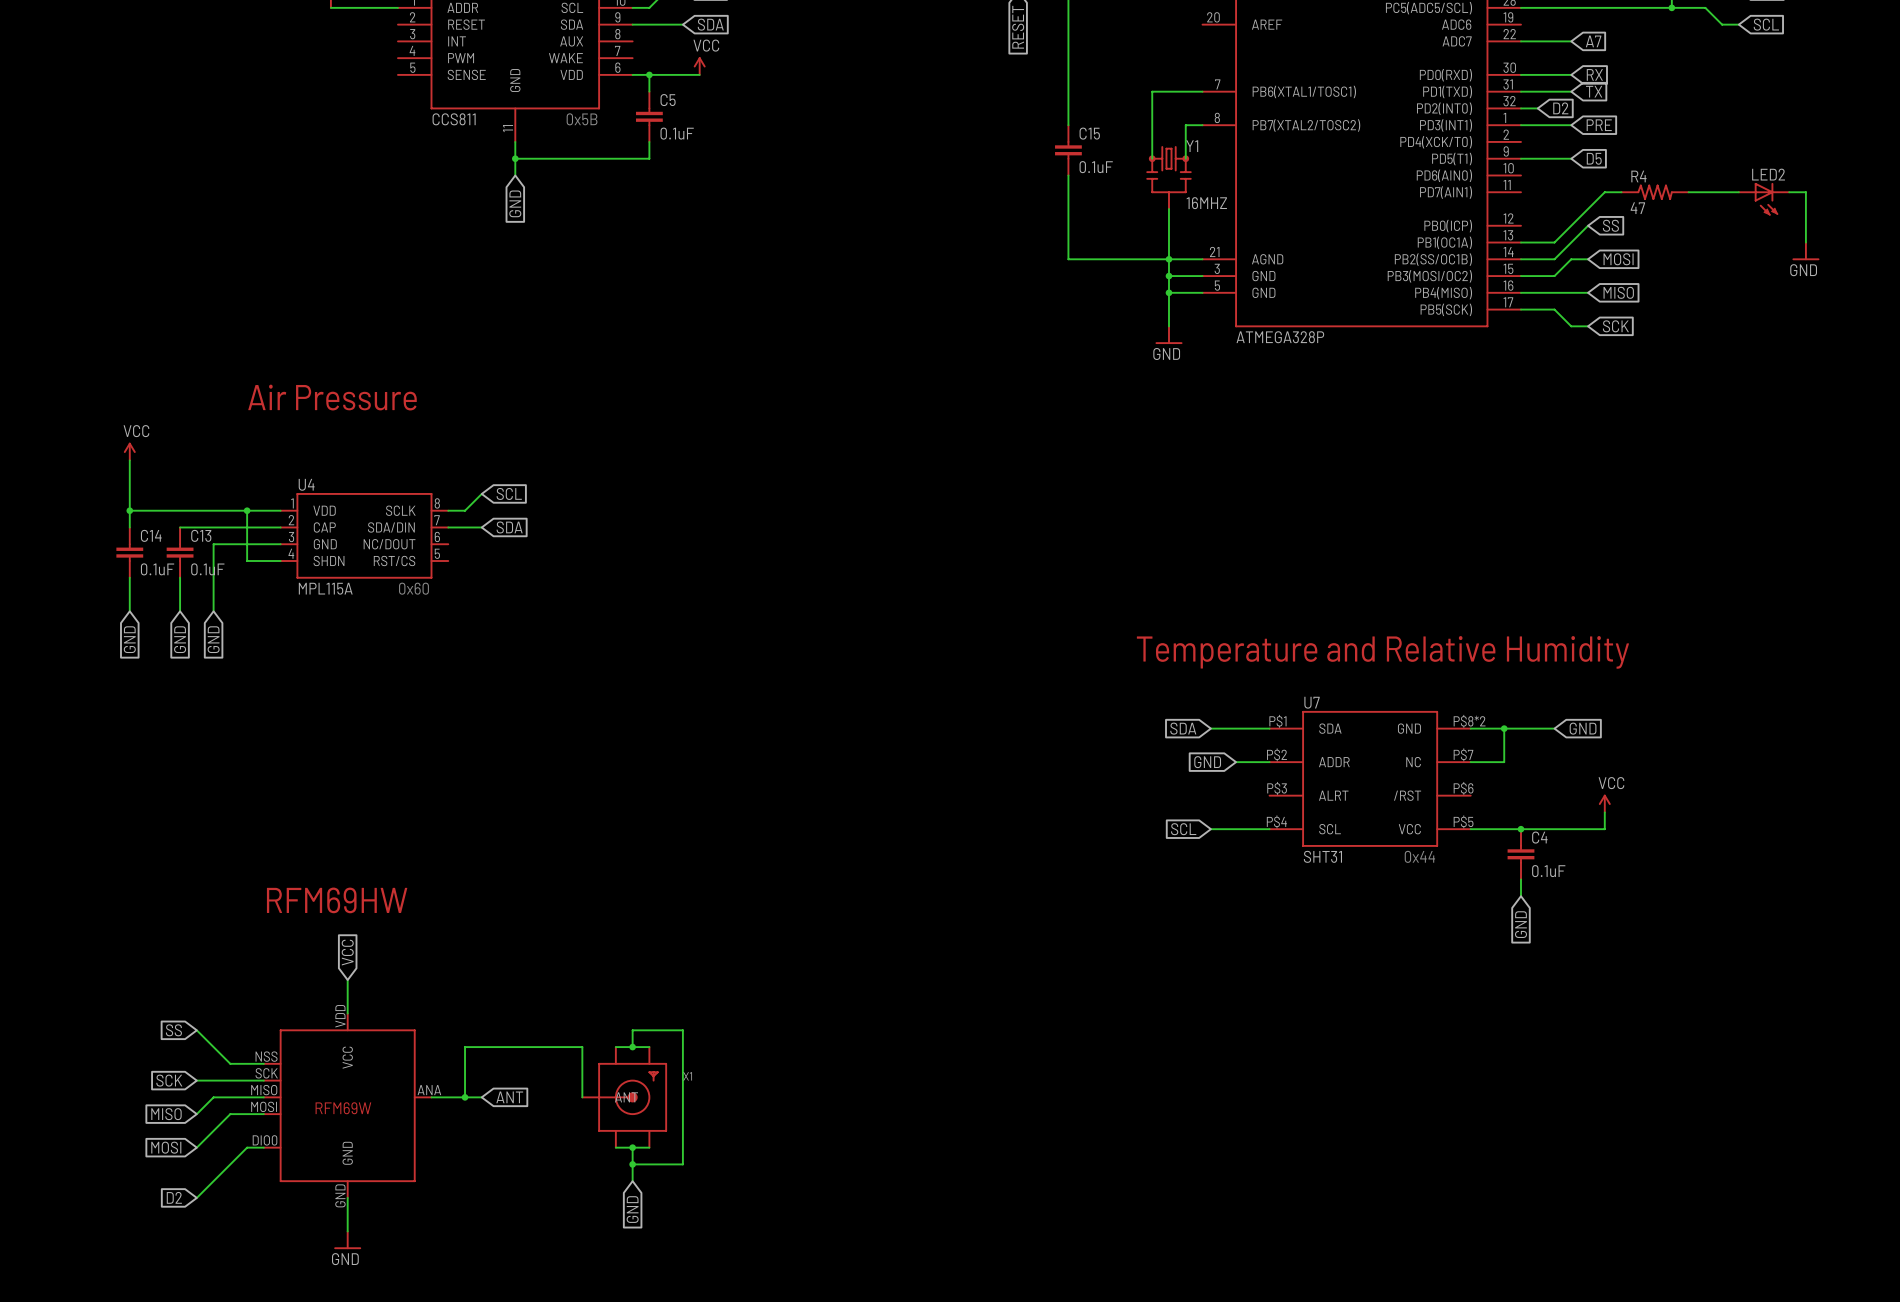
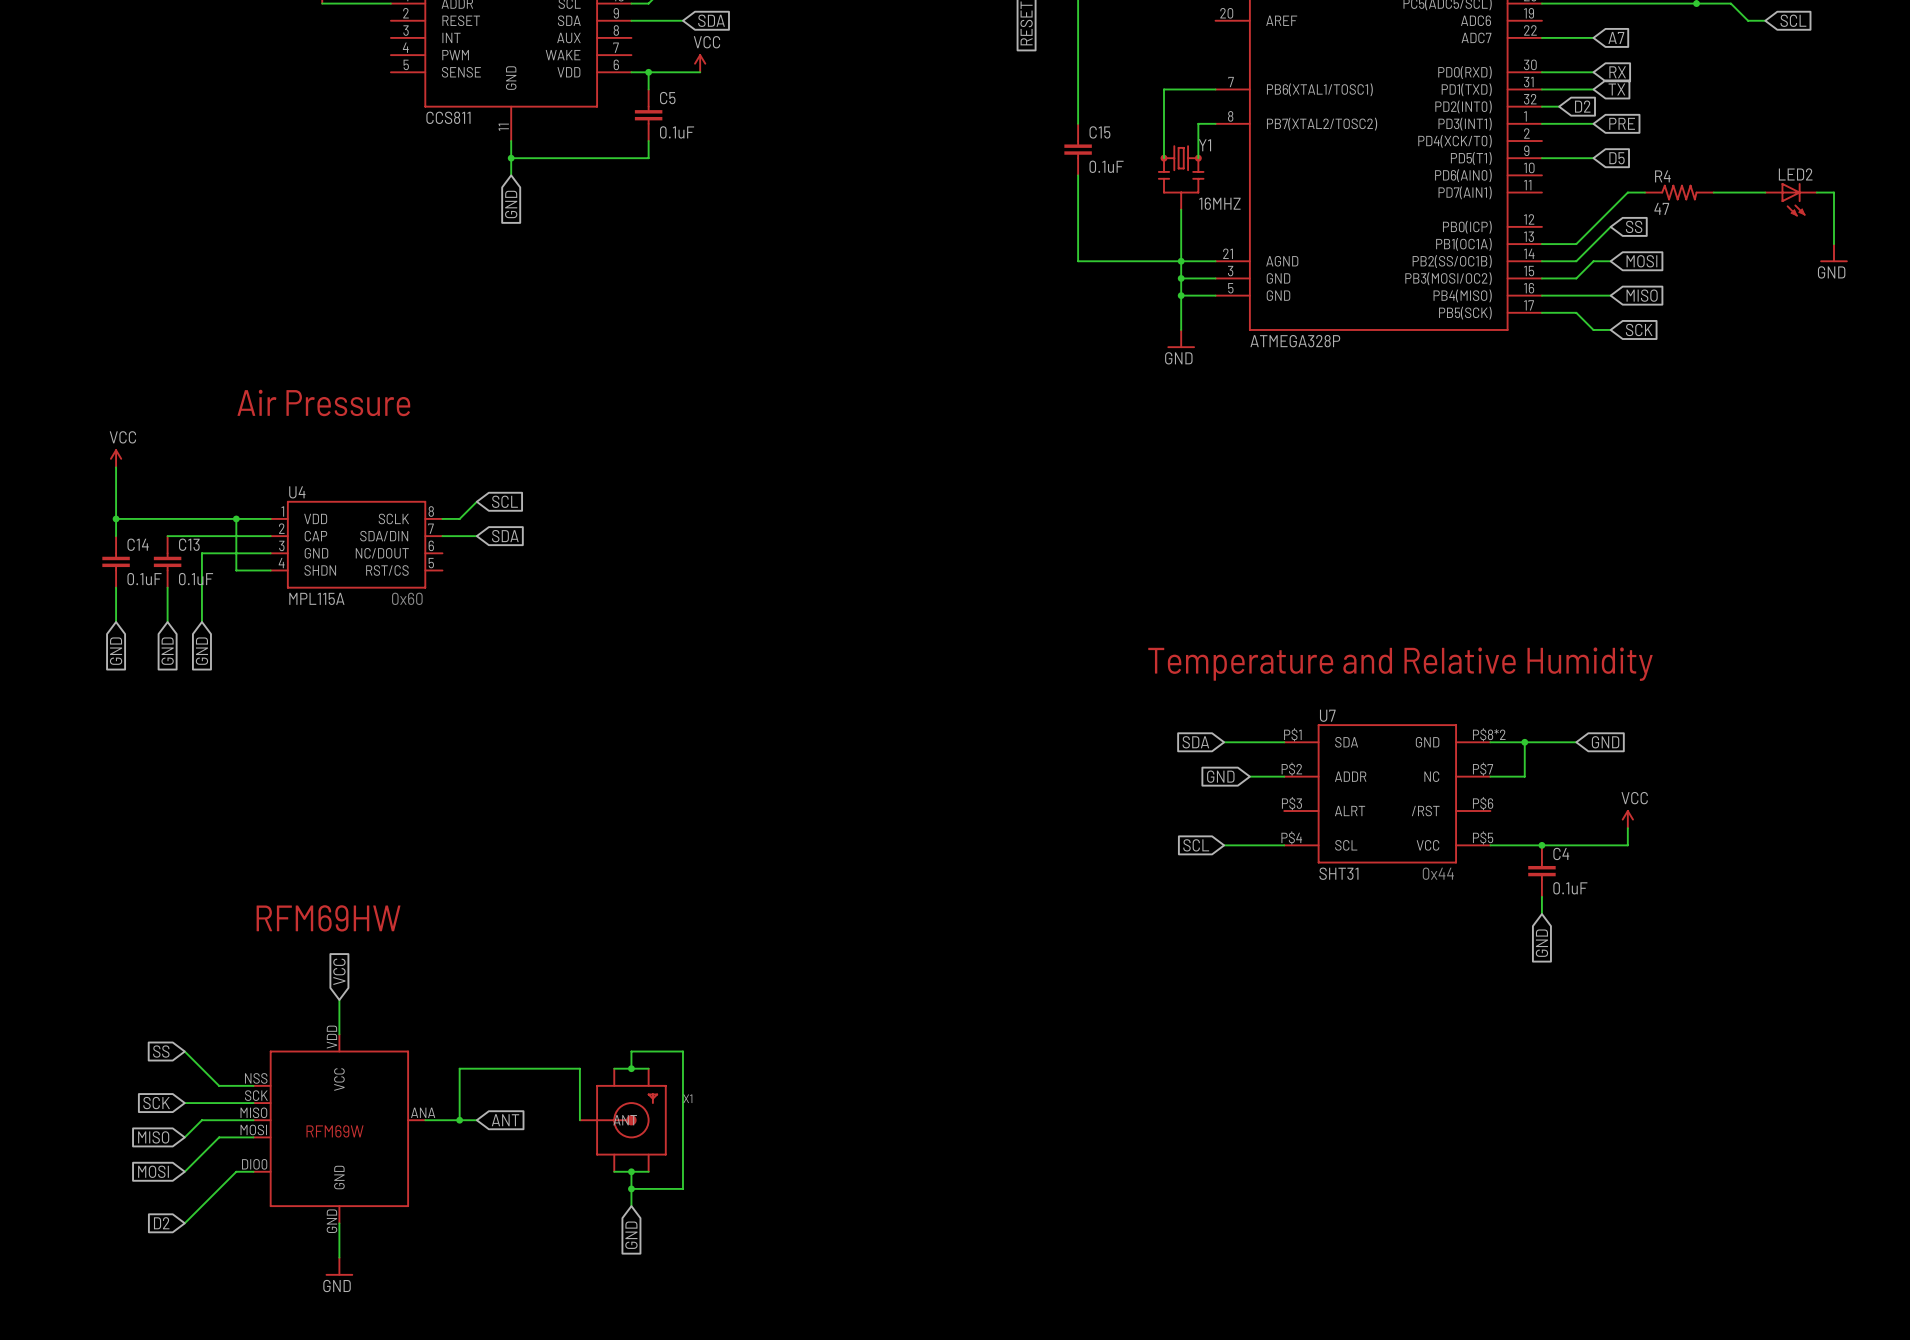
text: 0x5B (582, 119) -> none

